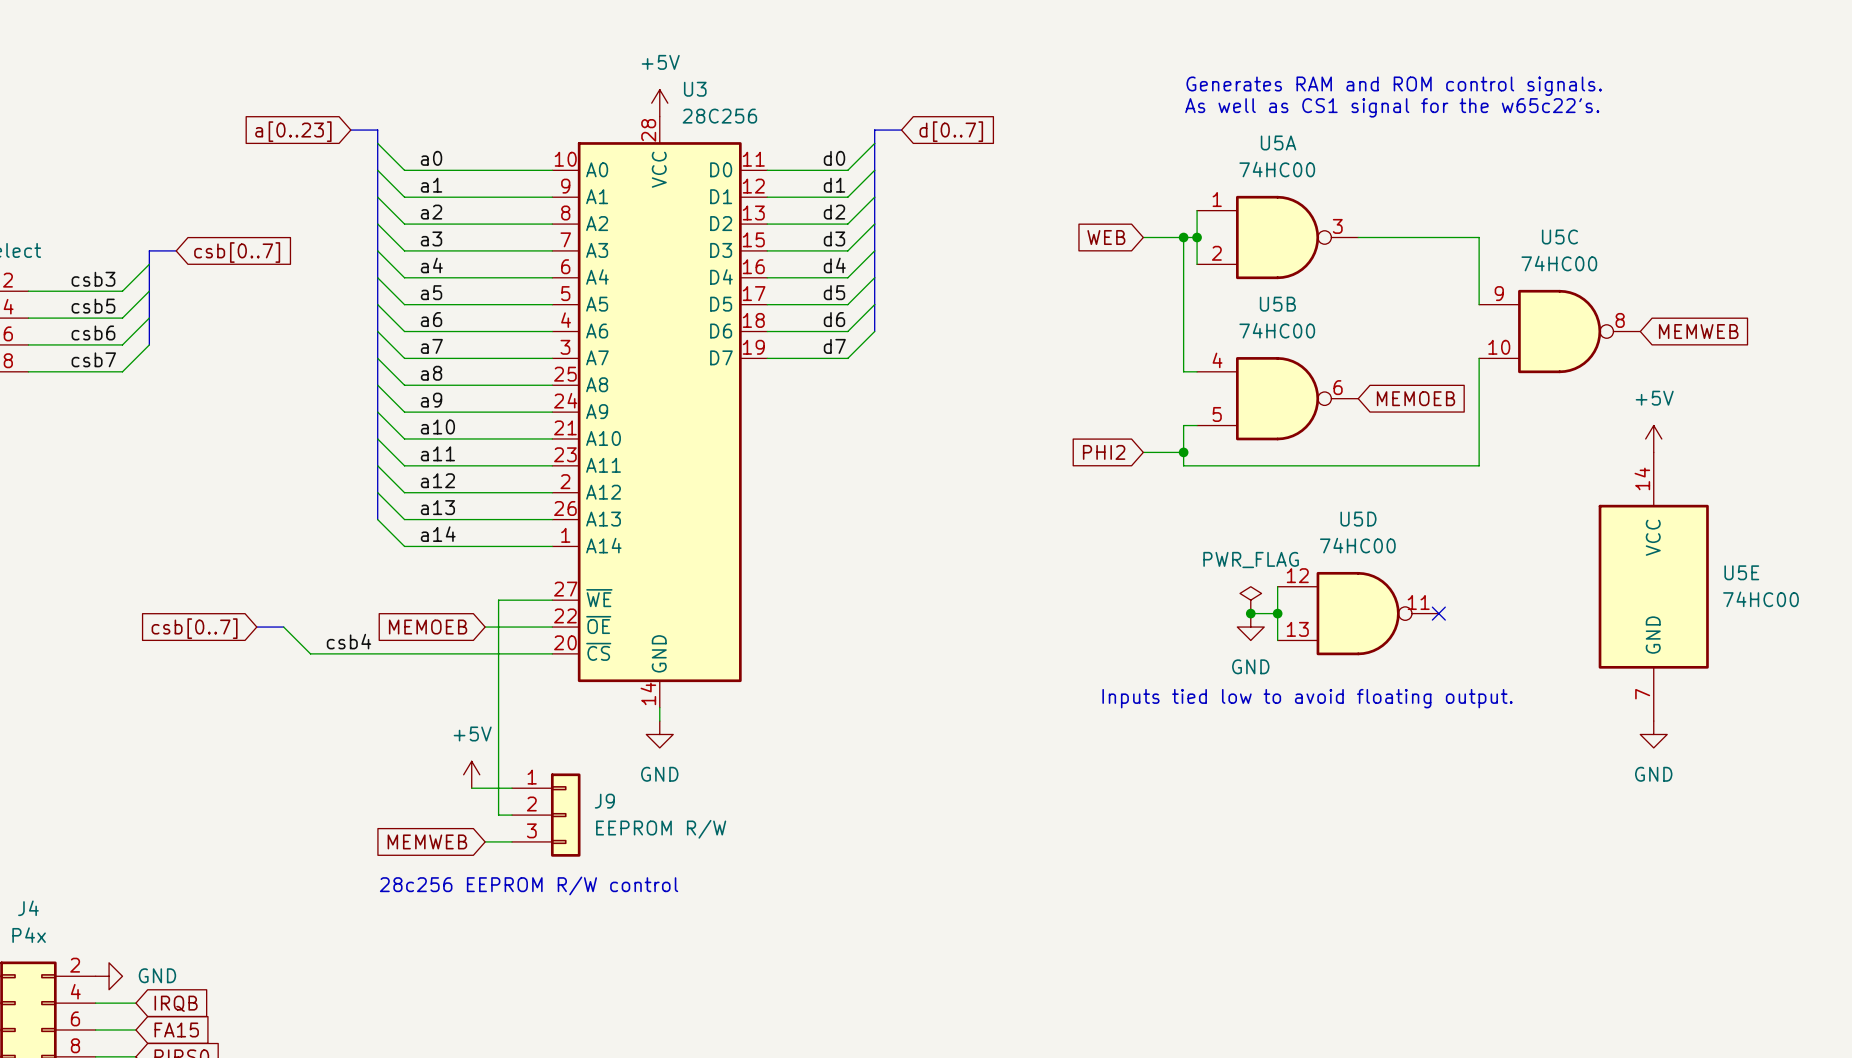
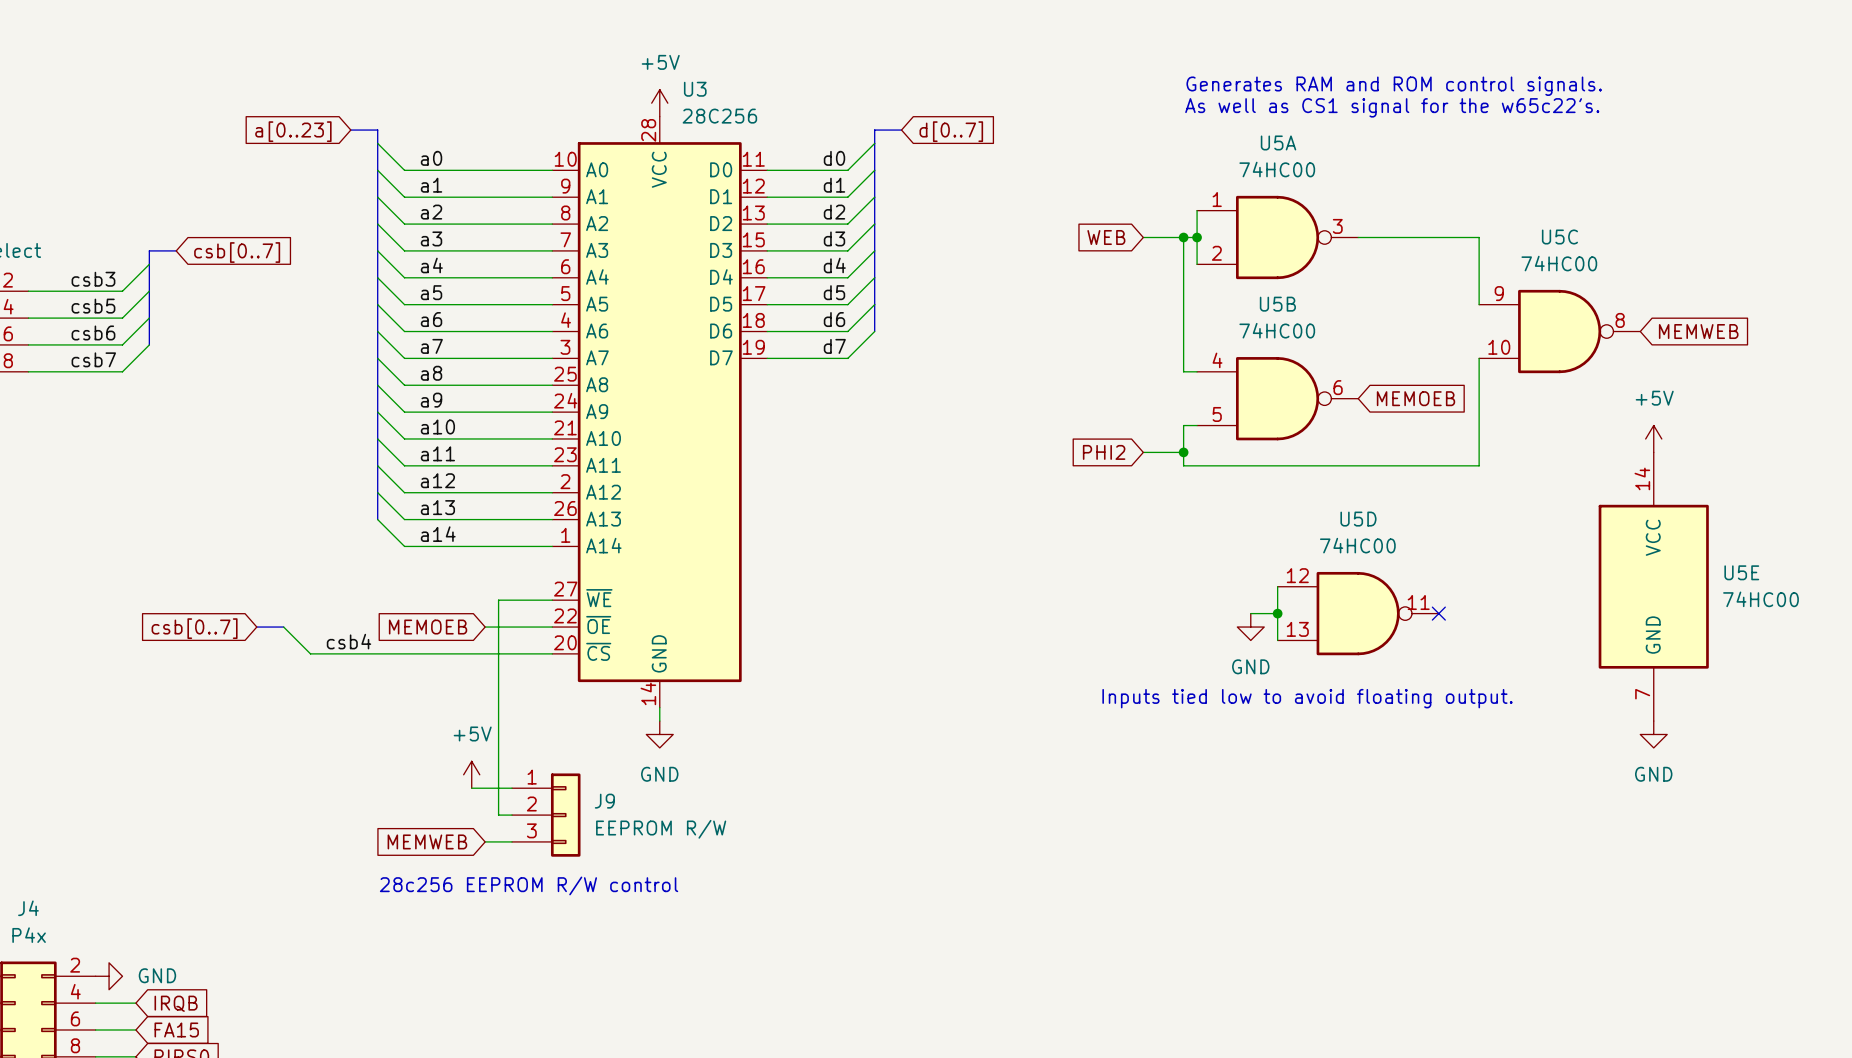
power symbol: PWR_FLAG (1250, 600) -> none
junction: (1250, 613) -> none

